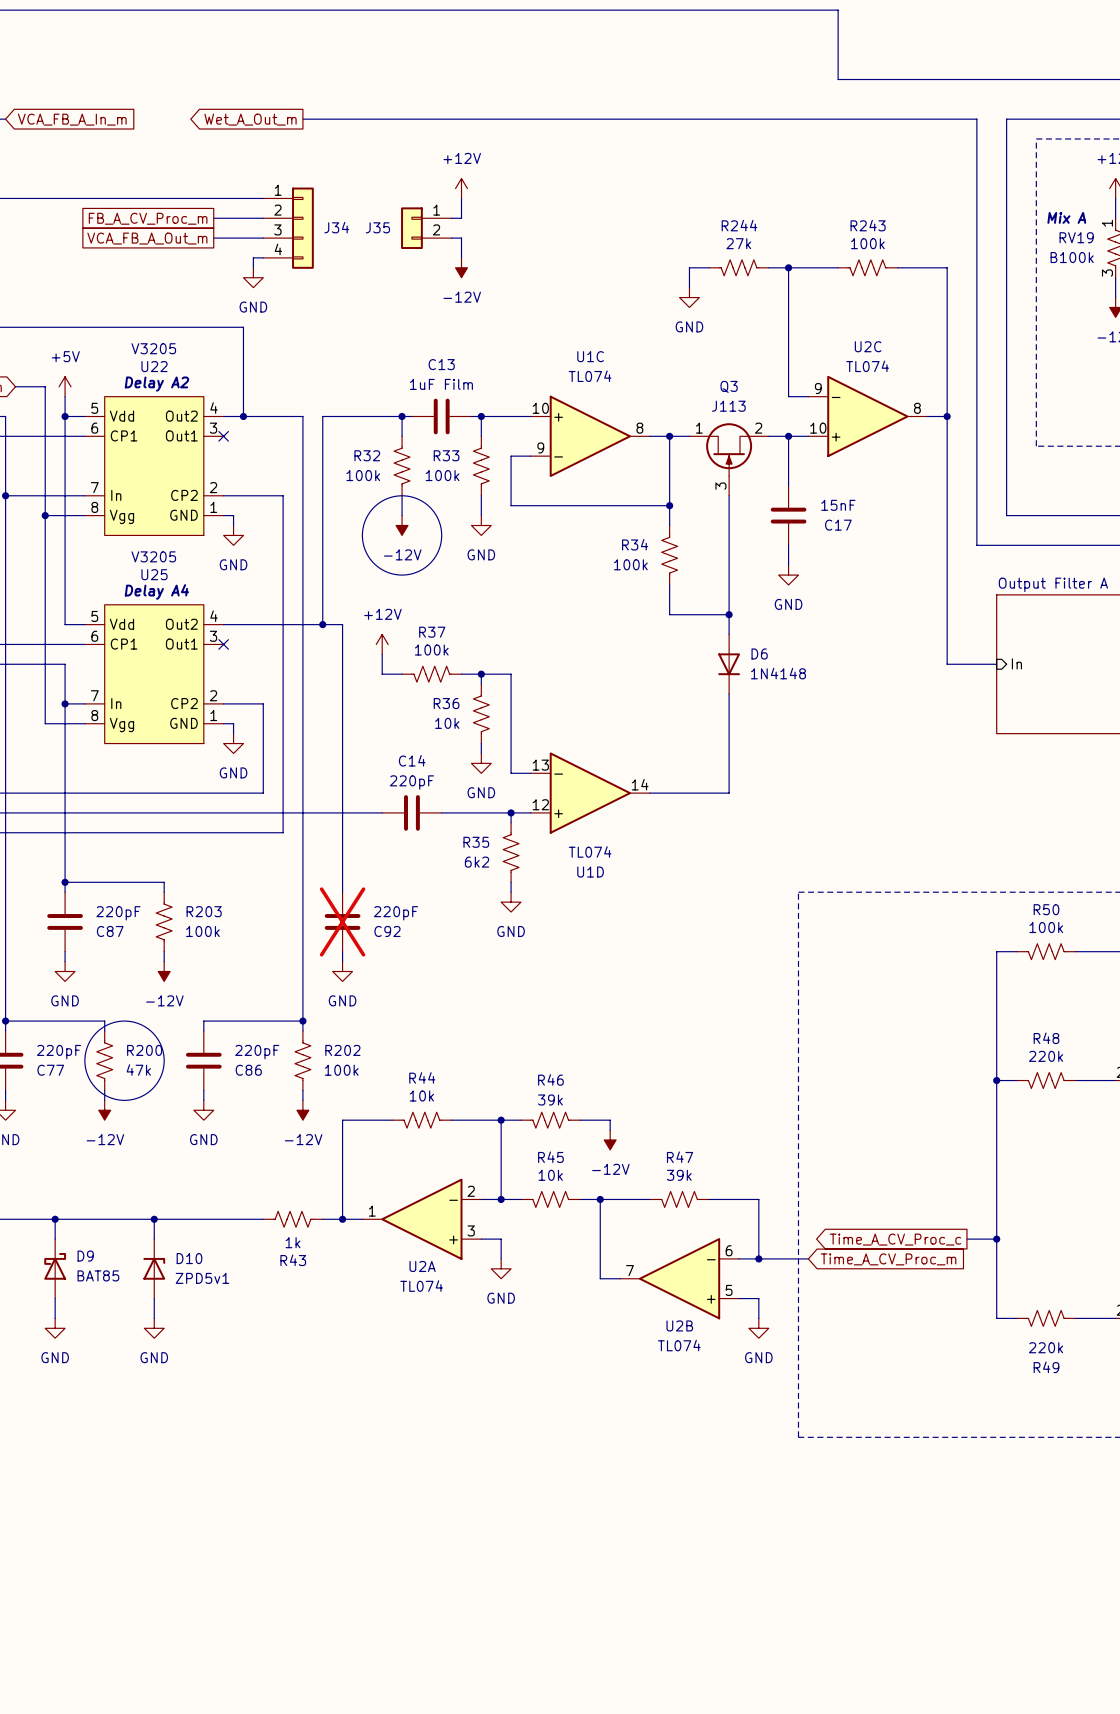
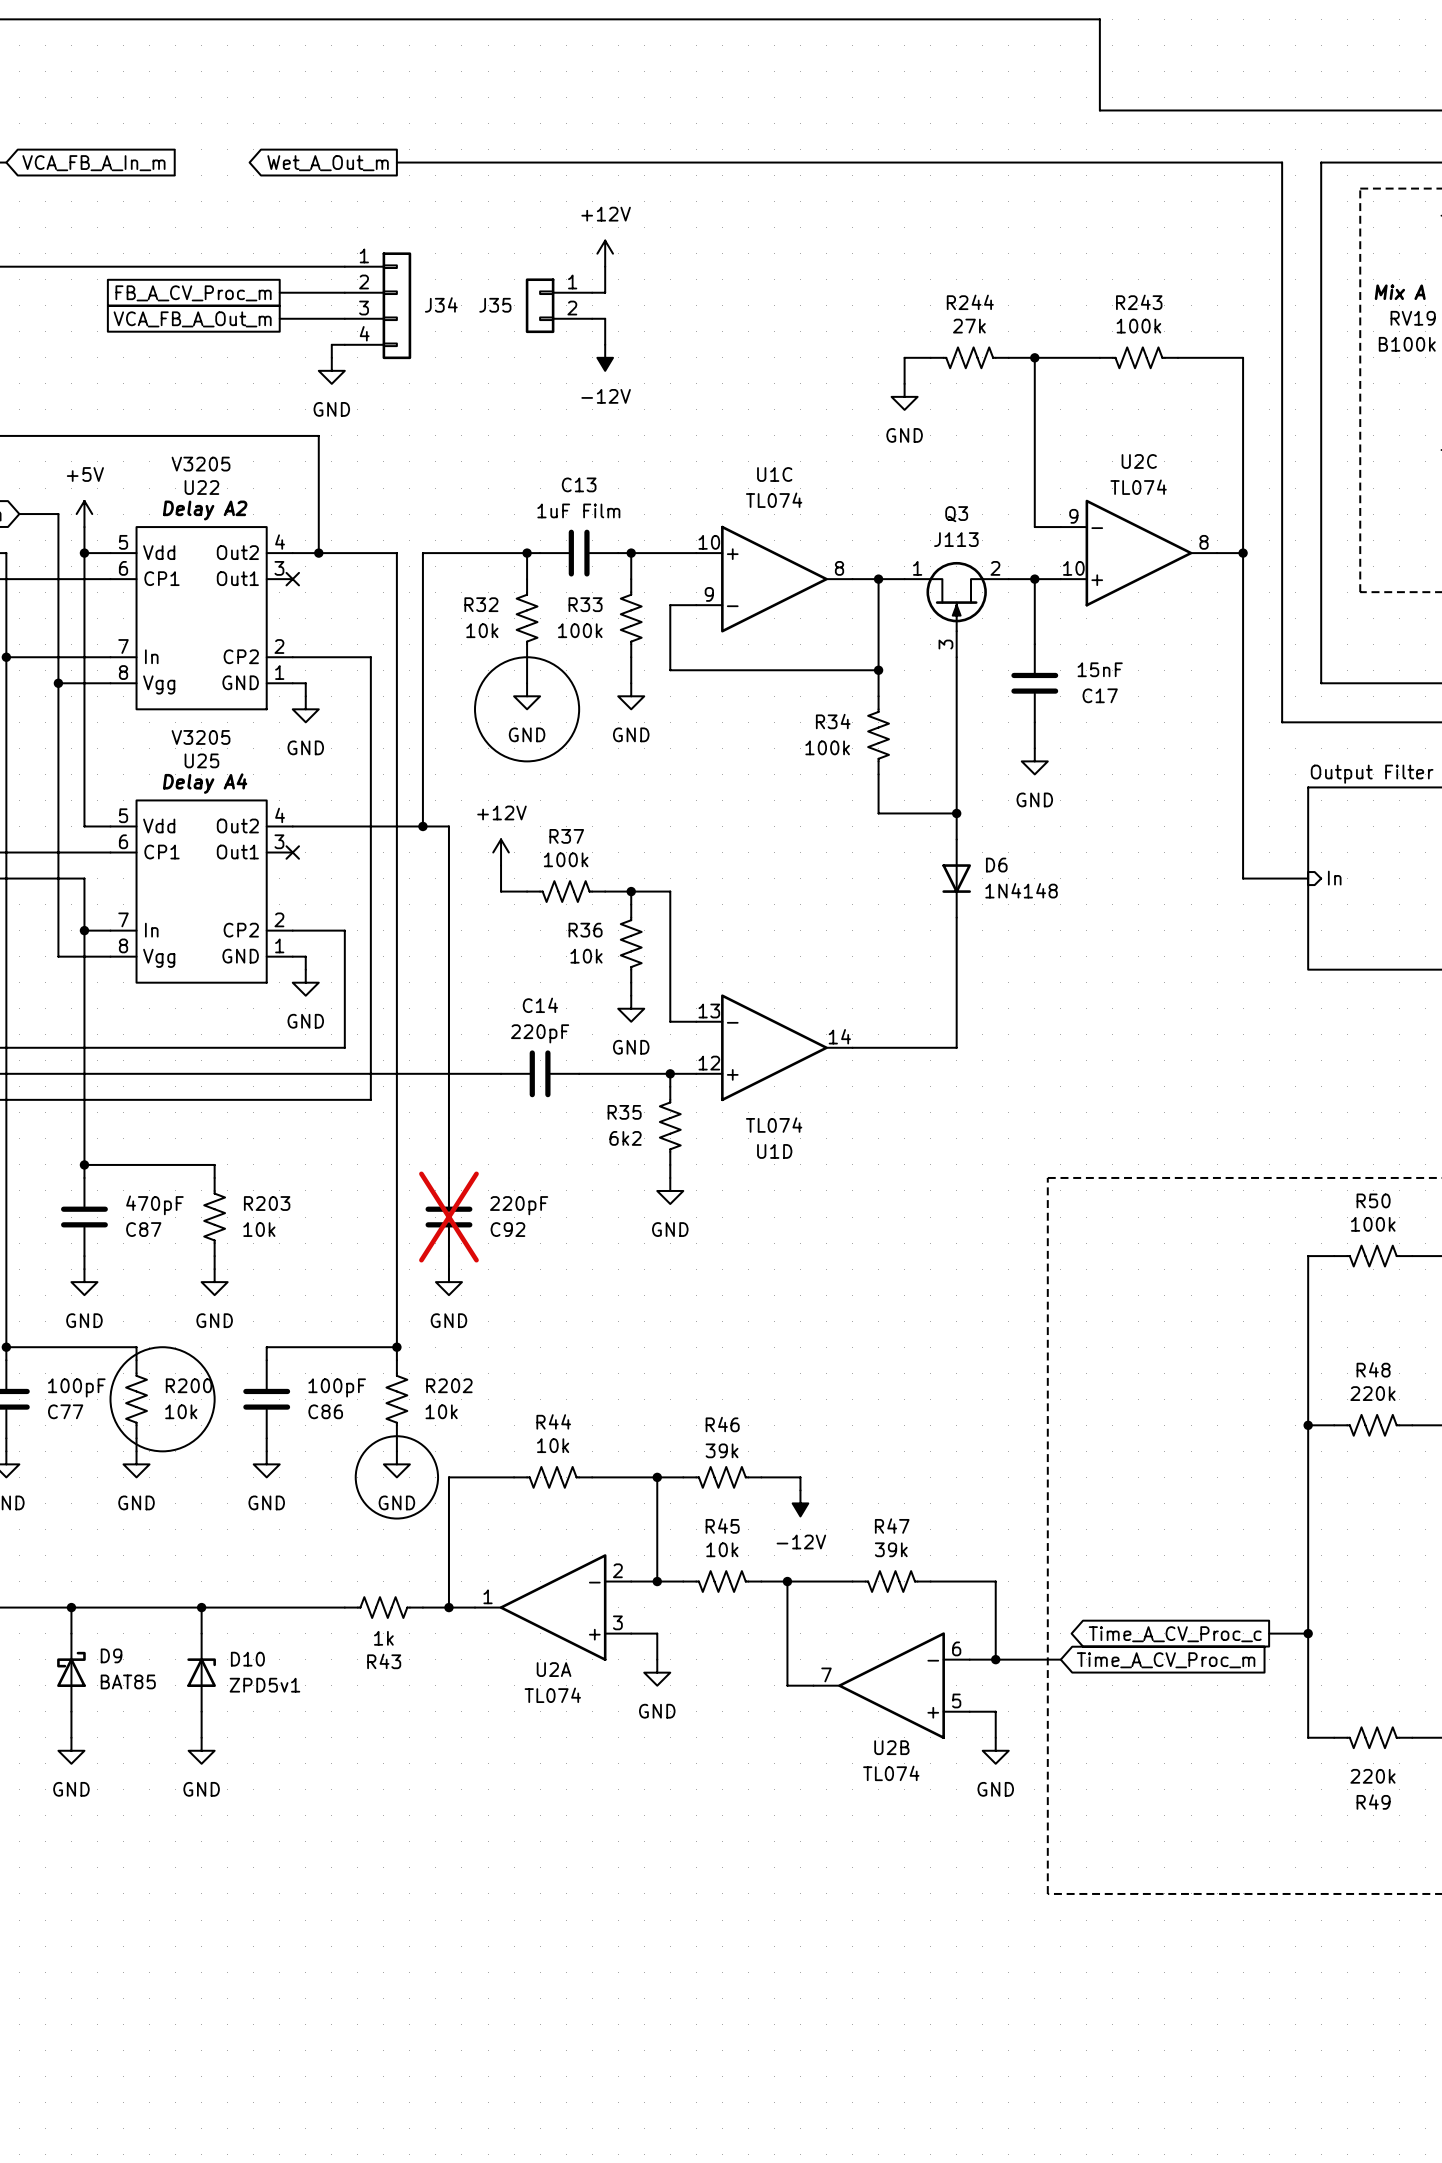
R32 value: 100k (363, 475) -> 10k (482, 630)
power symbol: -12V (402, 525) -> GND (527, 696)
C87 value: 220pF (118, 913) -> 470pF (154, 1205)
R203 value: 100k (202, 931) -> 10k (259, 1229)
power symbol: -12V (164, 971) -> GND (214, 1282)
C77 value: 220pF (59, 1052) -> 100pF (76, 1387)
C86 value: 220pF (257, 1052) -> 100pF (337, 1387)
R200 value: 47k (138, 1070) -> 10k (181, 1411)
R202 value: 100k (341, 1070) -> 10k (441, 1411)
drawing: none -> [355, 1436, 439, 1519]
power symbol: -12V (104, 1110) -> GND (136, 1464)
power symbol: -12V (302, 1110) -> GND (396, 1464)

